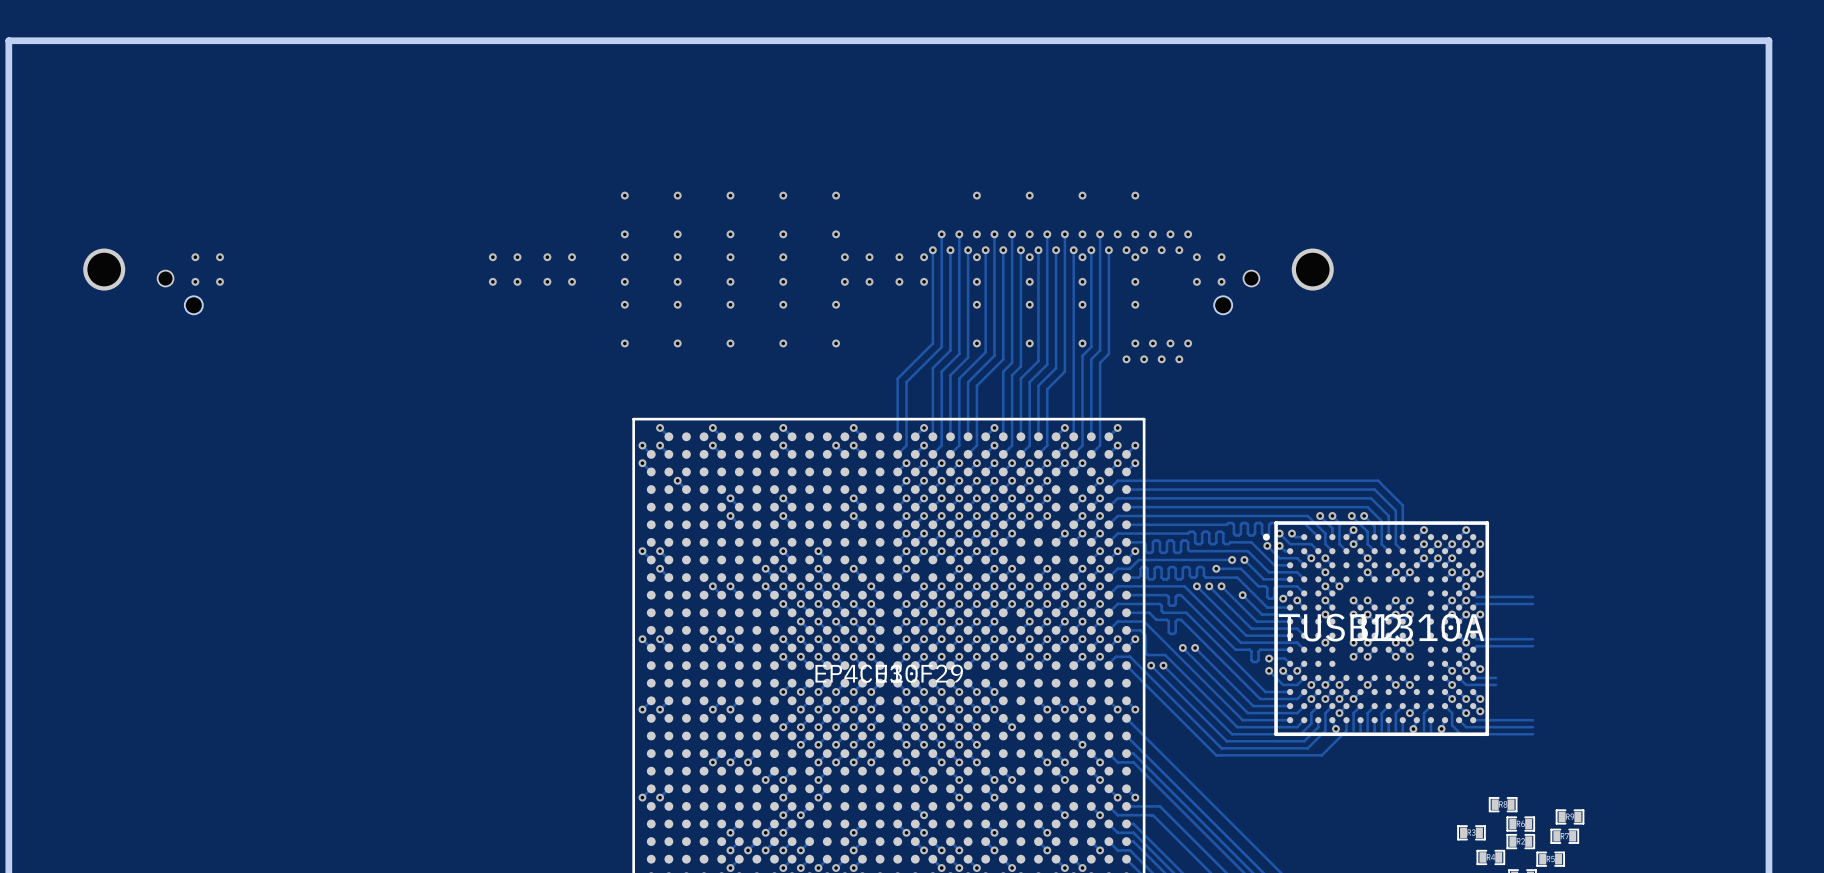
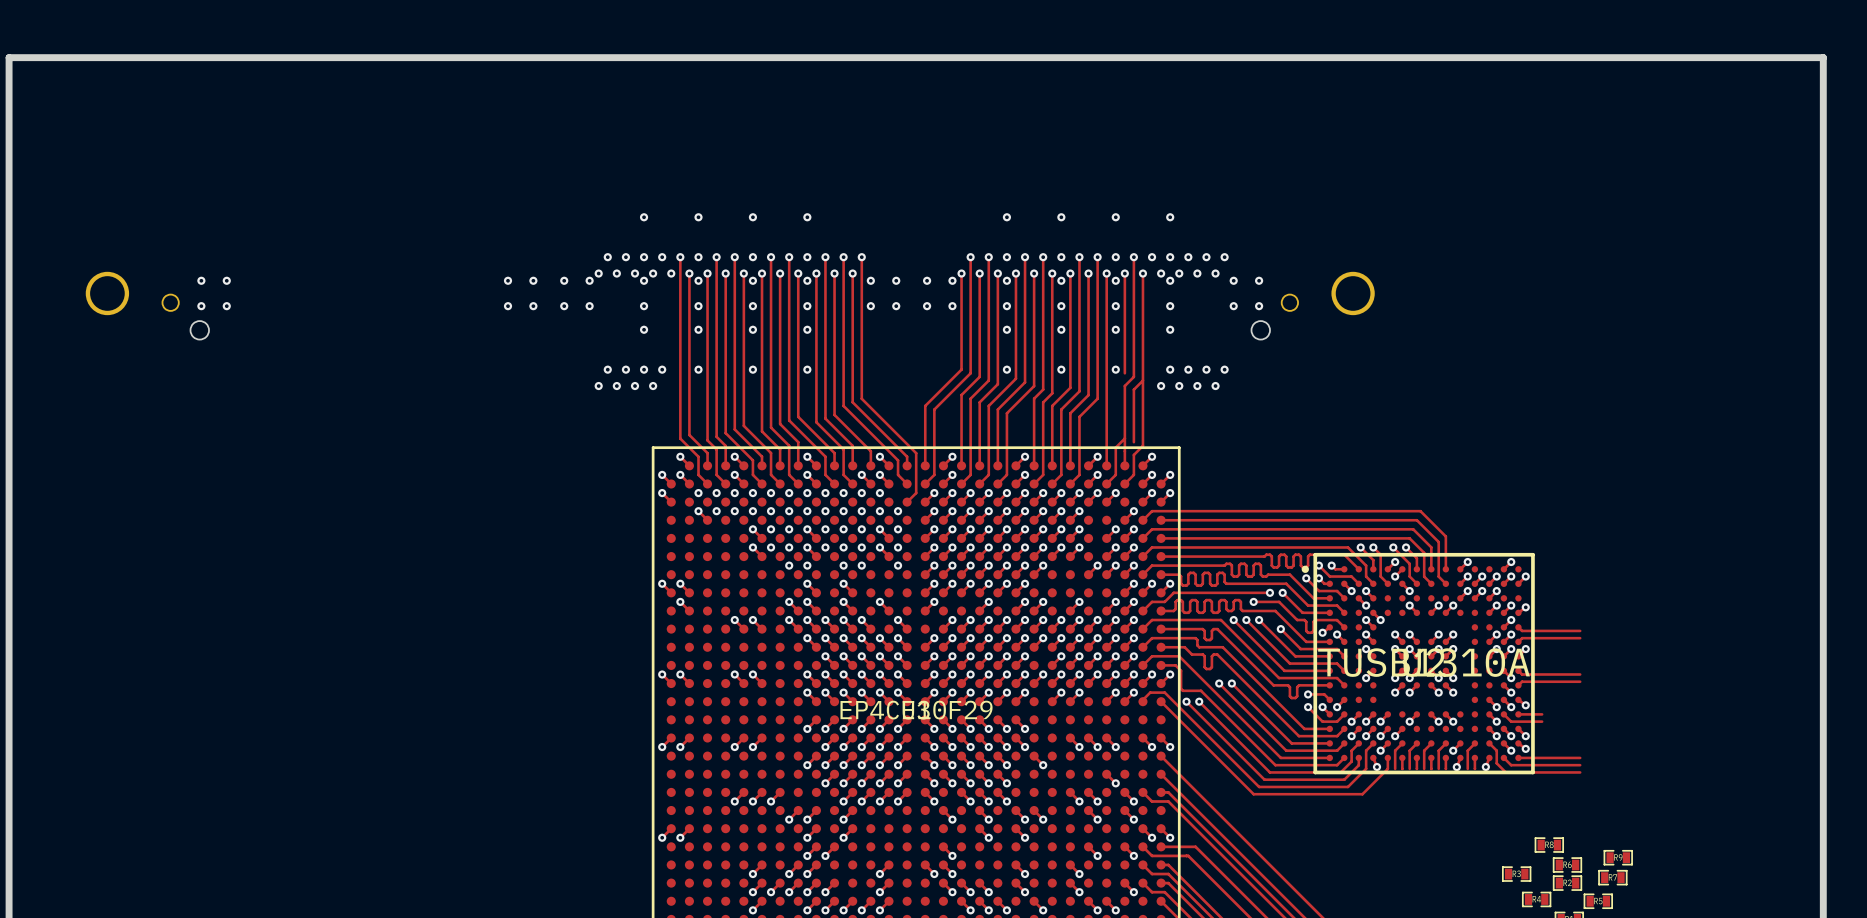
via: (836, 195) -> none
via: none -> (607, 257)
via: none -> (625, 257)
via: none -> (662, 257)
track: none -> (680, 257) (680, 438) (698, 456) (698, 474) (707, 483)
via: none -> (680, 257)
track: none -> (716, 257) (716, 436) (725, 445) (725, 465)
via: none -> (716, 257)
track: none -> (734, 257) (734, 429) (762, 456) (762, 465)
via: none -> (734, 257)
track: none -> (771, 257) (771, 427) (789, 445) (789, 474) (798, 483)
via: none -> (771, 257)
track: none -> (789, 257) (789, 420) (825, 456) (825, 474) (834, 483)
via: none -> (789, 257)
track: none -> (825, 257) (825, 418) (852, 445) (852, 465)
via: none -> (825, 257)
track: none -> (843, 257) (843, 405) (898, 460) (898, 474) (907, 483)
via: none -> (843, 257)
track: none -> (861, 257) (861, 398) (916, 453) (916, 493) (907, 502)
via: none -> (598, 273)
via: none -> (616, 273)
via: none -> (635, 273)
via: none -> (653, 273)
via: none -> (671, 273)
track: none -> (689, 273) (689, 435) (707, 453) (707, 465)
via: none -> (689, 273)
track: none -> (707, 273) (707, 440) (716, 449) (716, 474) (725, 483)
via: none -> (707, 273)
track: none -> (725, 273) (725, 433) (752, 460) (752, 474) (762, 483)
via: none -> (725, 273)
track: none -> (743, 273) (743, 425) (771, 453) (771, 474) (780, 483)
via: none -> (743, 273)
track: none -> (762, 273) (762, 431) (780, 449) (780, 465)
via: none -> (762, 273)
track: none -> (780, 273) (780, 424) (798, 442) (798, 465)
via: none -> (780, 273)
track: none -> (798, 273) (798, 416) (834, 453) (834, 465)
via: none -> (798, 273)
track: none -> (816, 273) (816, 422) (843, 449) (843, 474) (852, 483)
via: none -> (816, 273)
track: none -> (834, 273) (834, 414) (870, 451) (870, 465)
via: none -> (834, 273)
track: none -> (852, 273) (852, 402) (907, 456) (907, 465)
via: none -> (852, 273)
via: (836, 304) -> none
via: none -> (607, 369)
via: none -> (625, 369)
via: none -> (662, 369)
via: (836, 343) -> none
track: (1091, 346) (1082, 355) (1082, 419) -> (1124, 438) (1115, 447)
via: none -> (598, 386)
via: none -> (616, 386)
via: none -> (635, 386)
via: none -> (653, 386)
track: (1100, 413) (1100, 426) -> (1142, 380) (1142, 445) (1133, 454)
via: none -> (698, 493)
via: none -> (716, 493)
via: none -> (734, 493)
via: none -> (752, 493)
via: none -> (771, 493)
via: none -> (789, 493)
via: none -> (807, 493)
via: none -> (825, 493)
via: none -> (843, 493)
via: none -> (861, 493)
via: none -> (879, 493)
via: none -> (716, 511)
via: none -> (734, 511)
via: none -> (752, 511)
via: none -> (771, 511)
via: none -> (789, 511)
via: none -> (807, 511)
via: none -> (825, 511)
via: none -> (843, 511)
via: none -> (861, 511)
via: none -> (879, 511)
via: none -> (898, 511)
via: none -> (771, 529)
via: none -> (789, 529)
via: none -> (825, 529)
via: none -> (843, 529)
via: none -> (861, 529)
via: none -> (898, 529)
via: none -> (771, 547)
via: none -> (789, 547)
via: none -> (825, 547)
via: none -> (843, 547)
via: none -> (861, 547)
via: none -> (898, 547)
via: none -> (789, 565)
via: none -> (807, 565)
via: none -> (843, 565)
via: none -> (861, 565)
via: none -> (898, 565)

